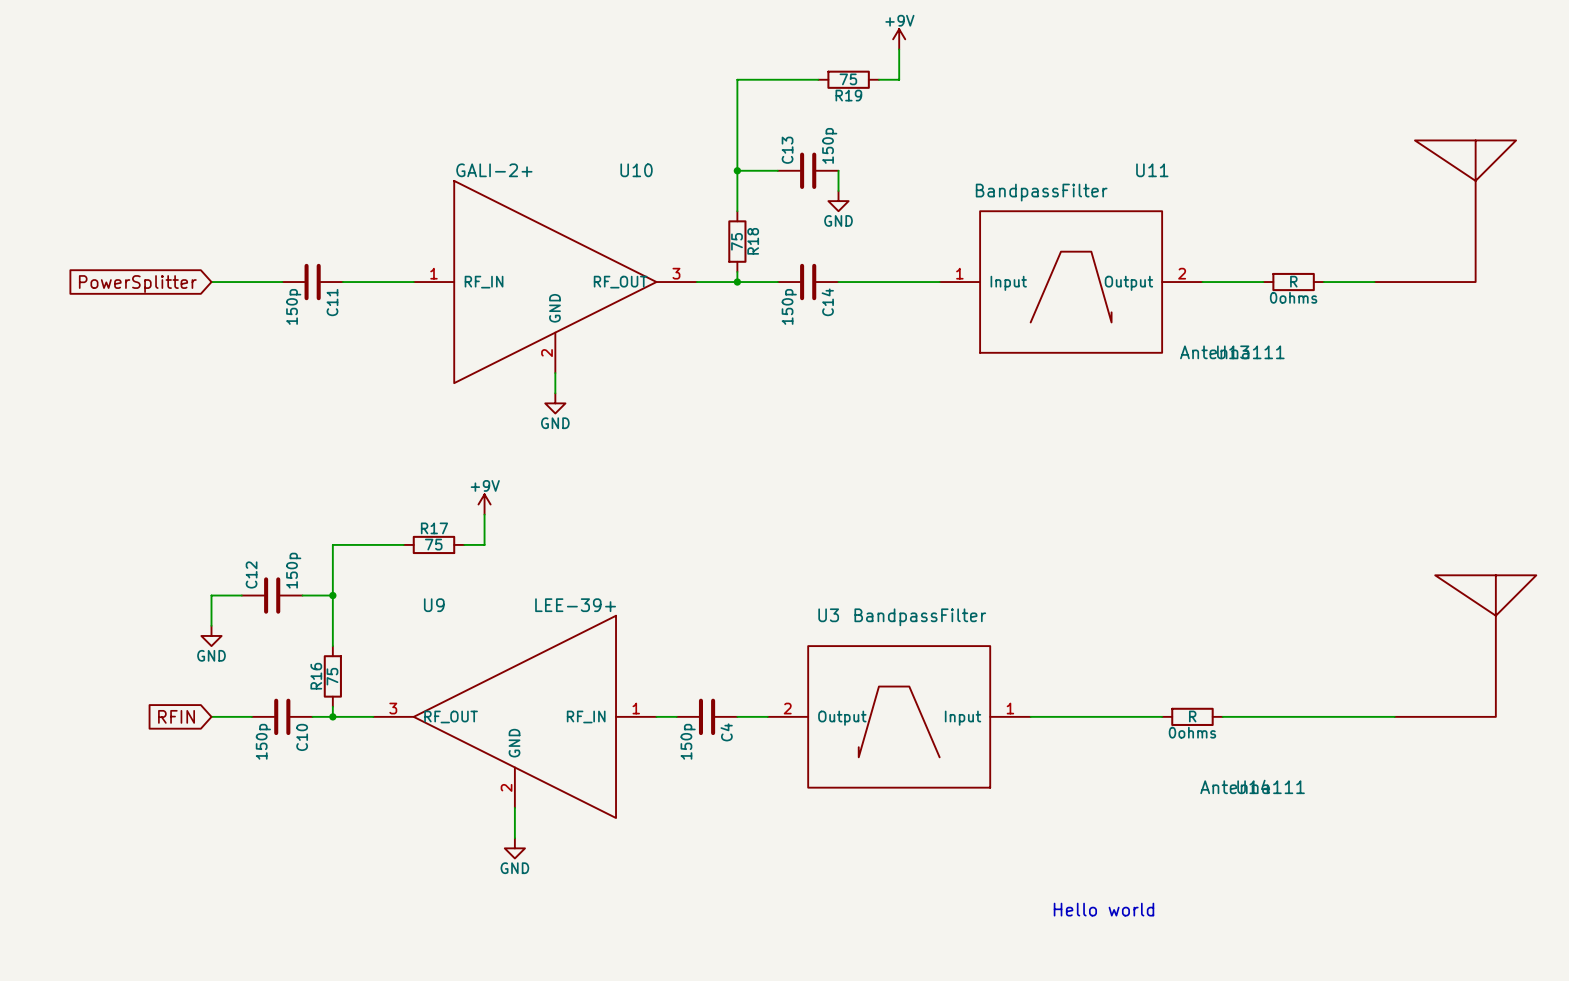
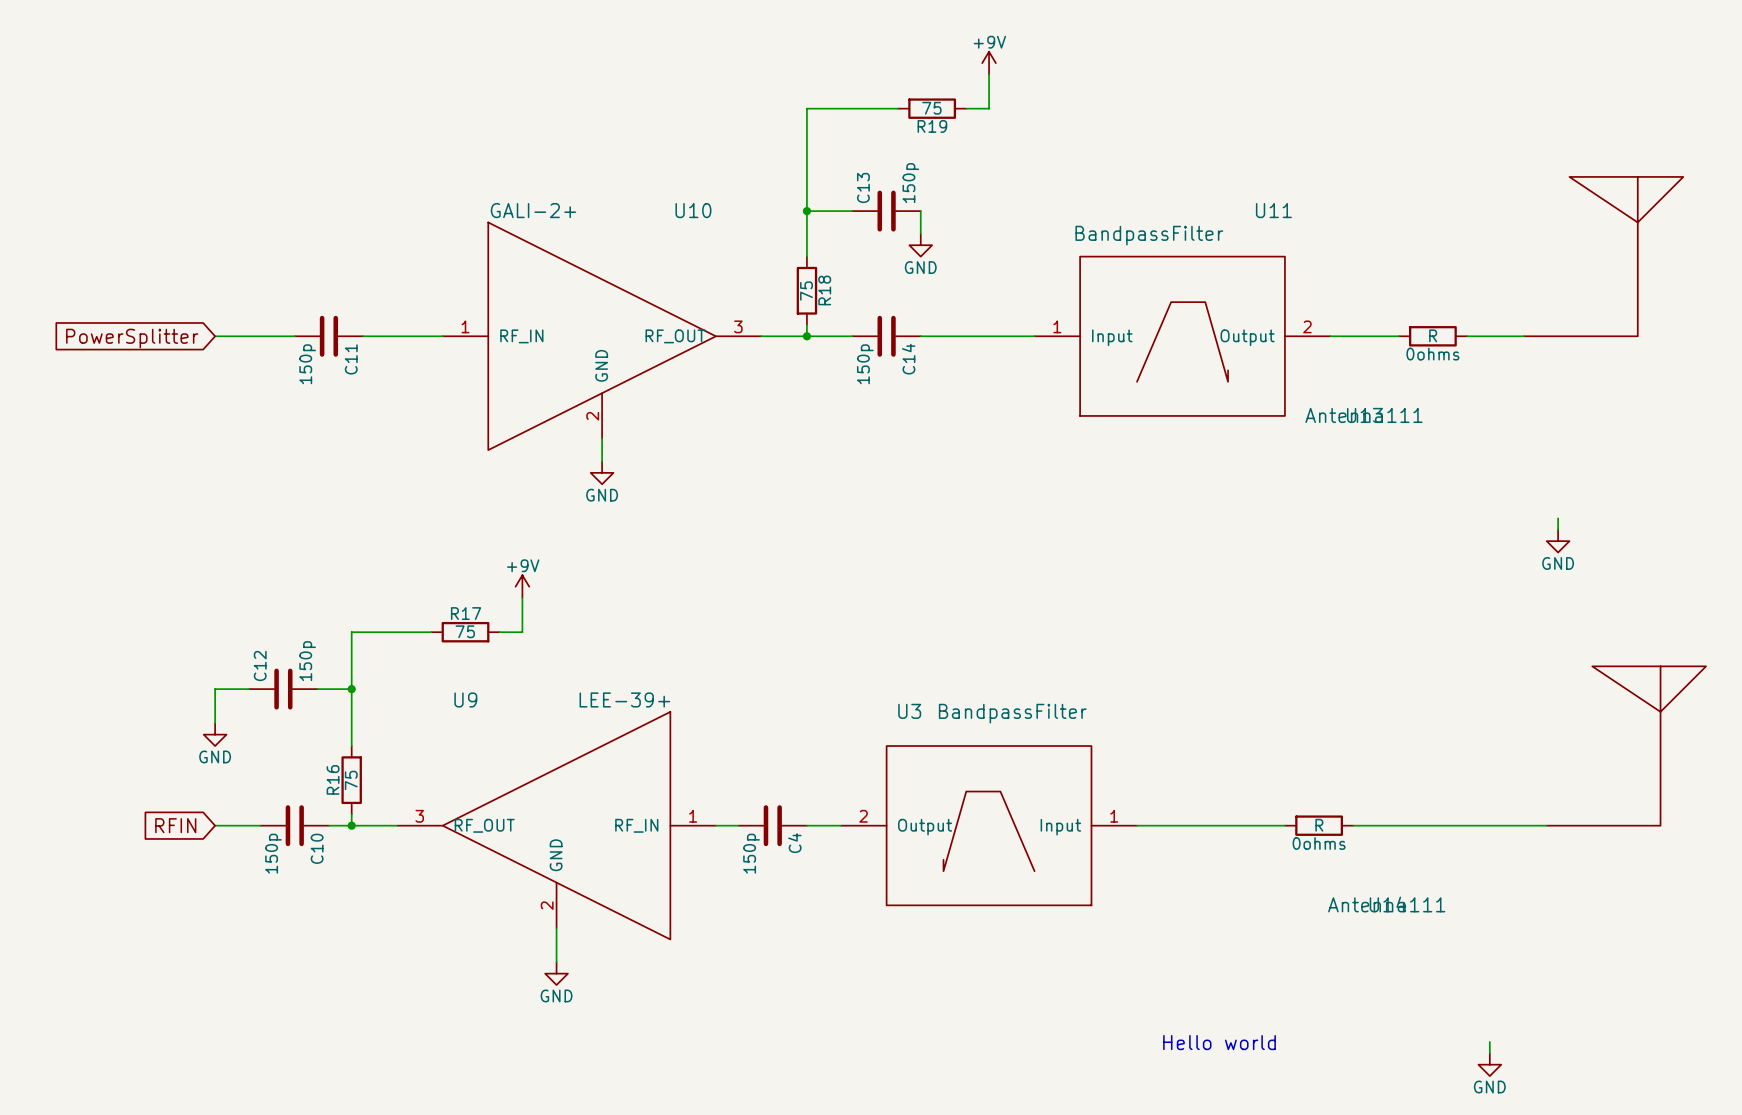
wire: none -> (1558, 518) (1558, 529)
power symbol: none -> GND (1558, 541)
wire: none -> (1489, 1041) (1489, 1053)
power symbol: none -> GND (1489, 1064)

